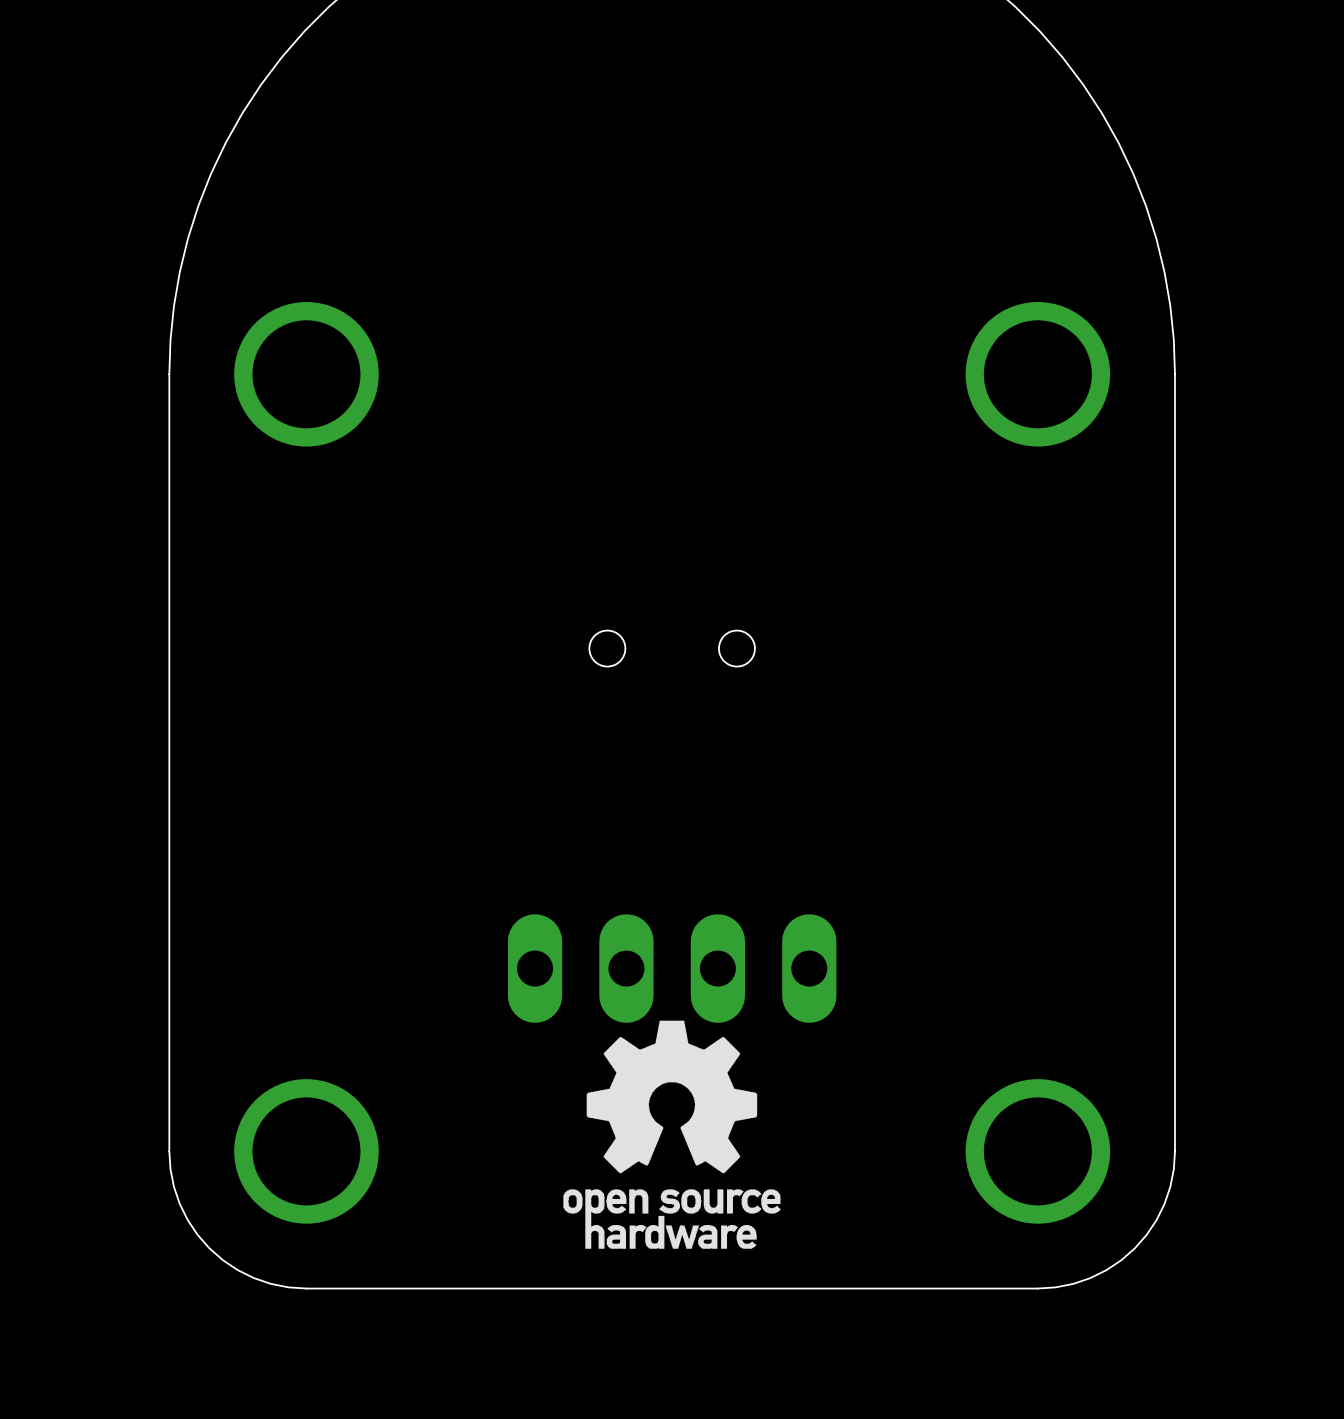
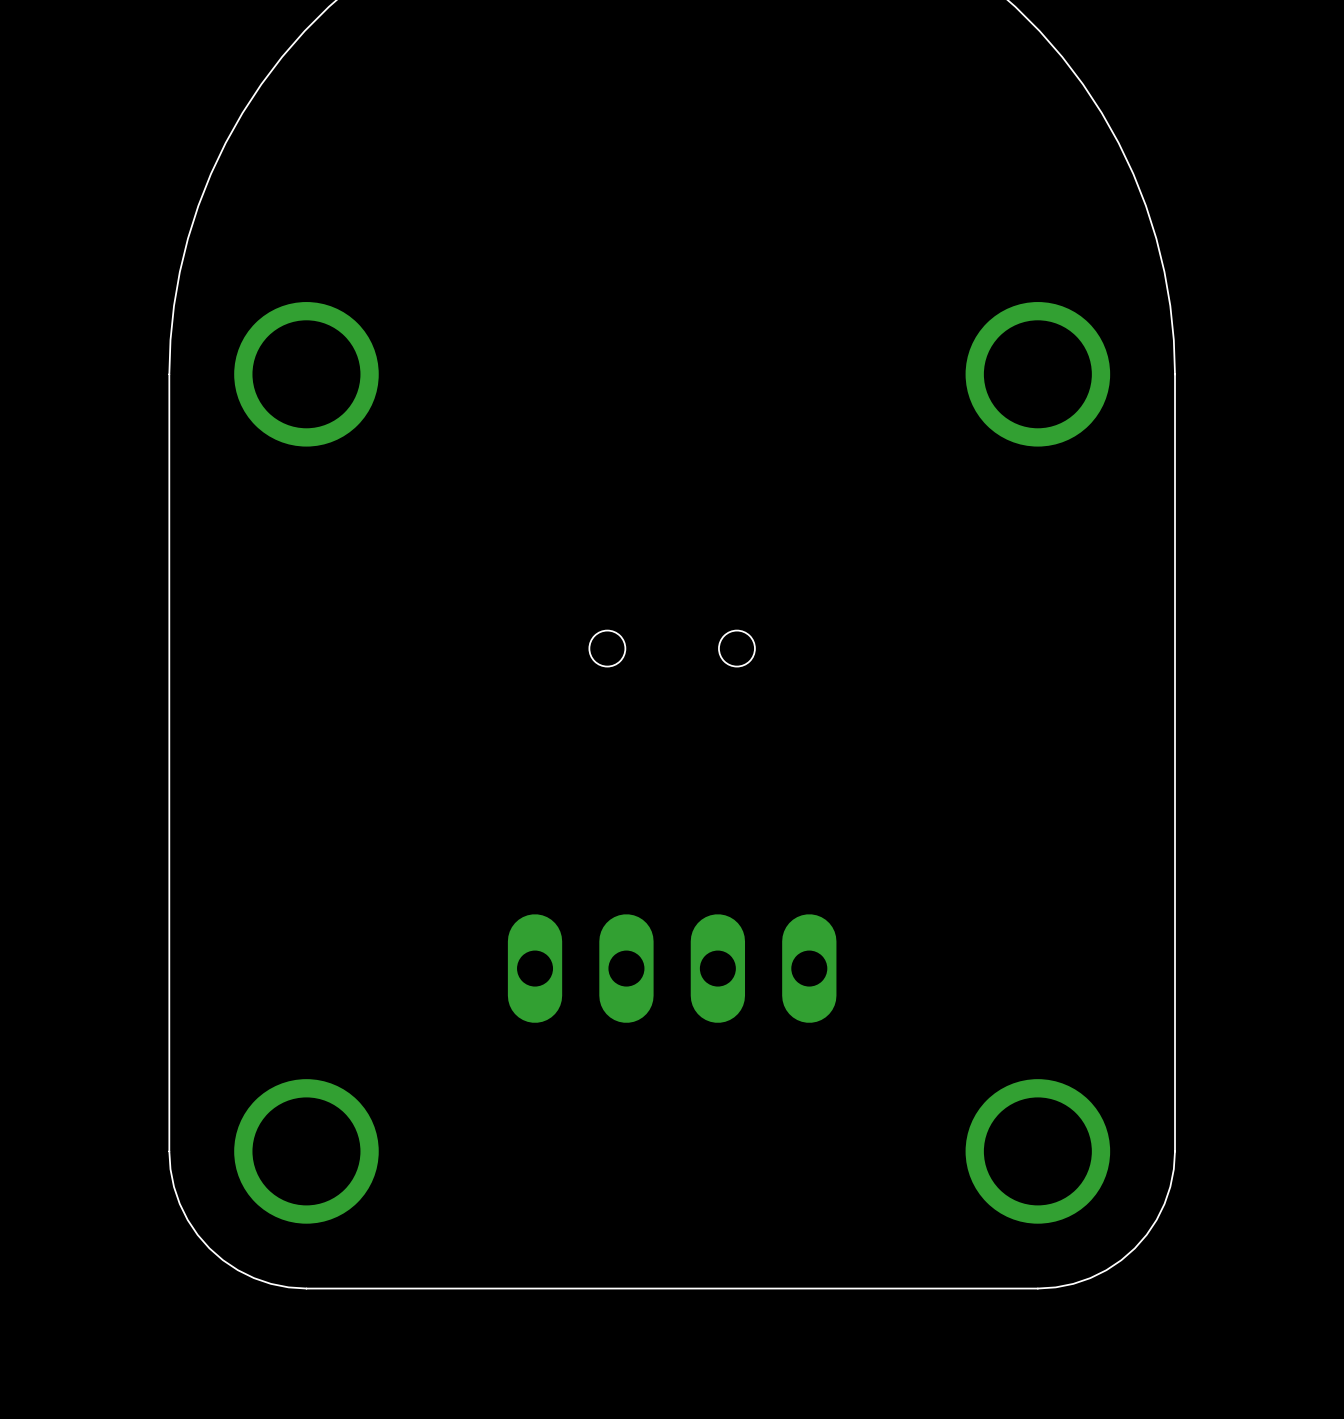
drawing: [563, 1020, 781, 1249] -> none

